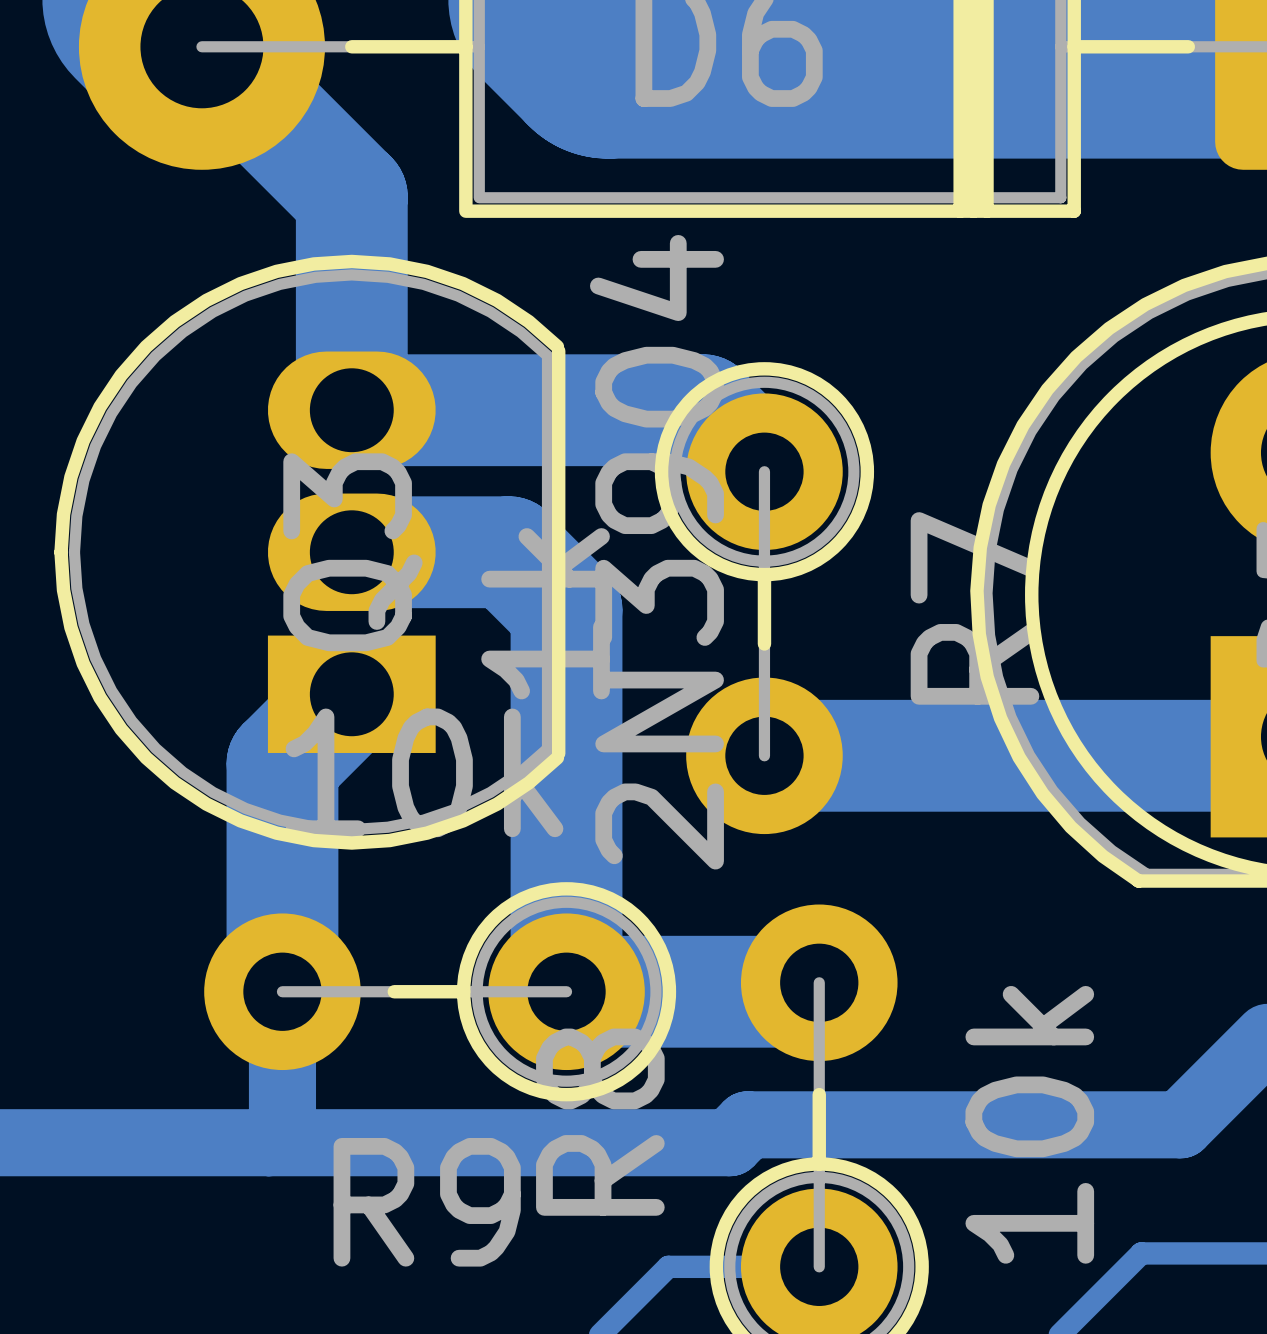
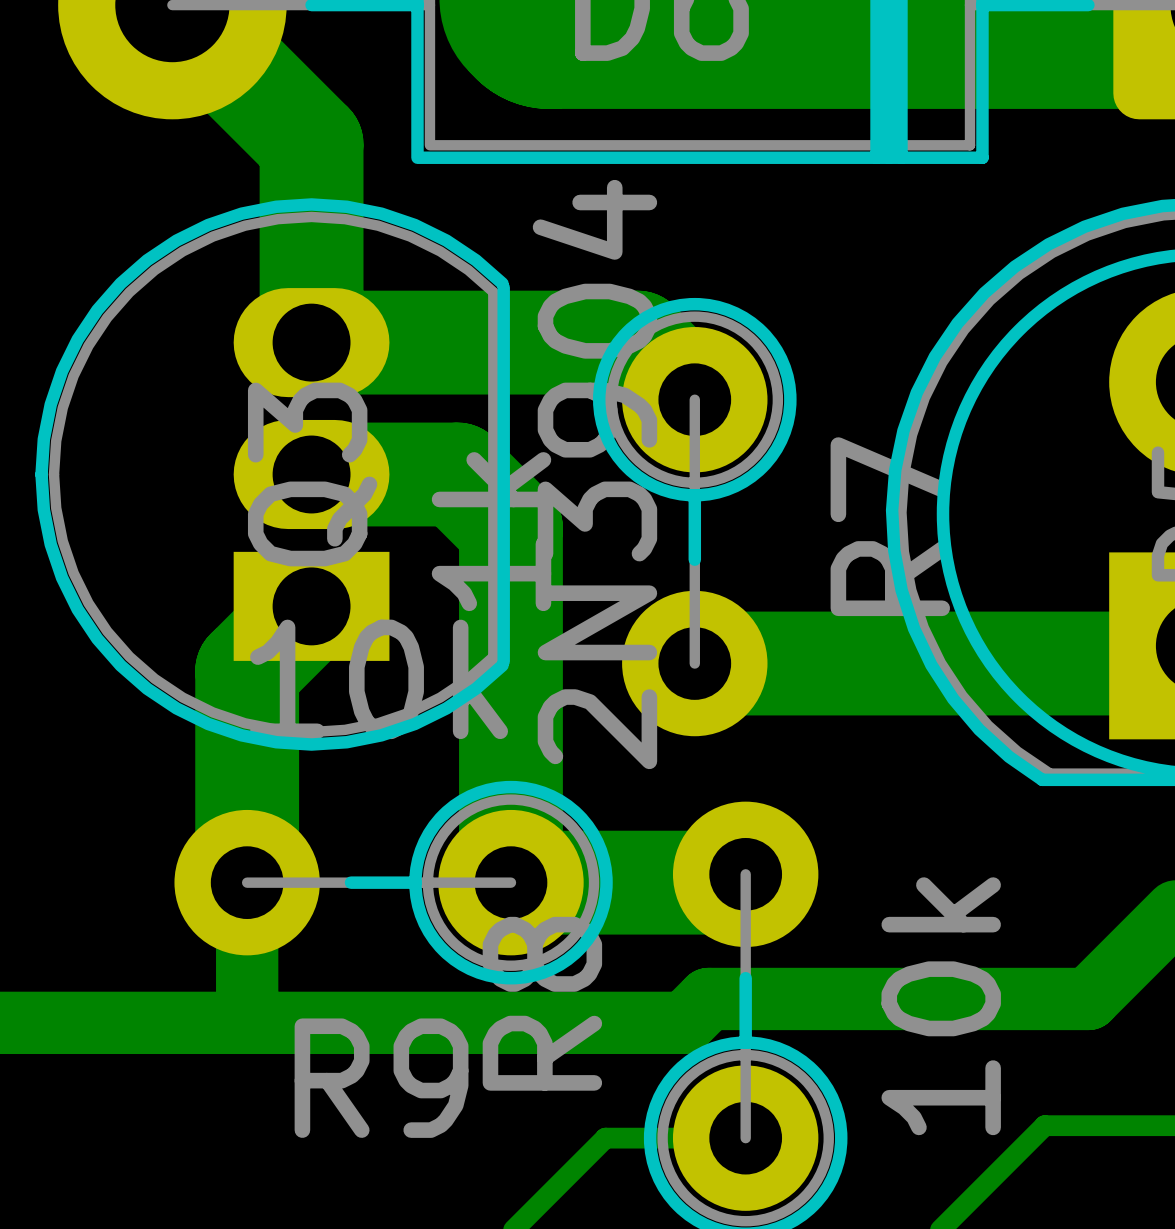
bottom track: (1188, 1116) (1180, 1124) (747, 1124) (729, 1142) -> (1088, 998) (708, 998) (684, 1022) (662, 1022)

